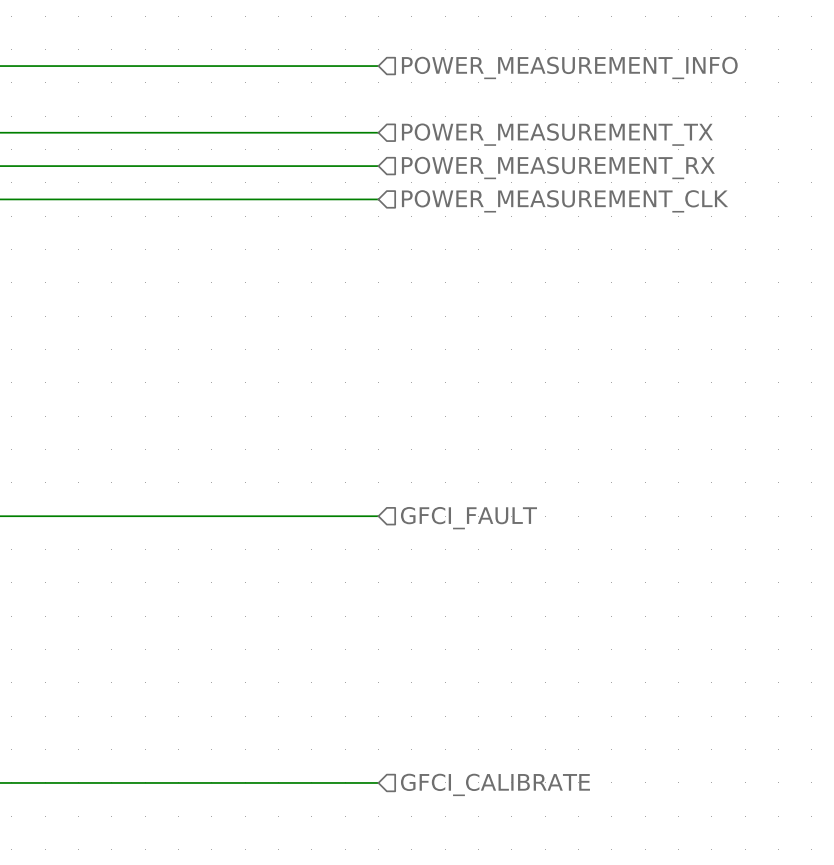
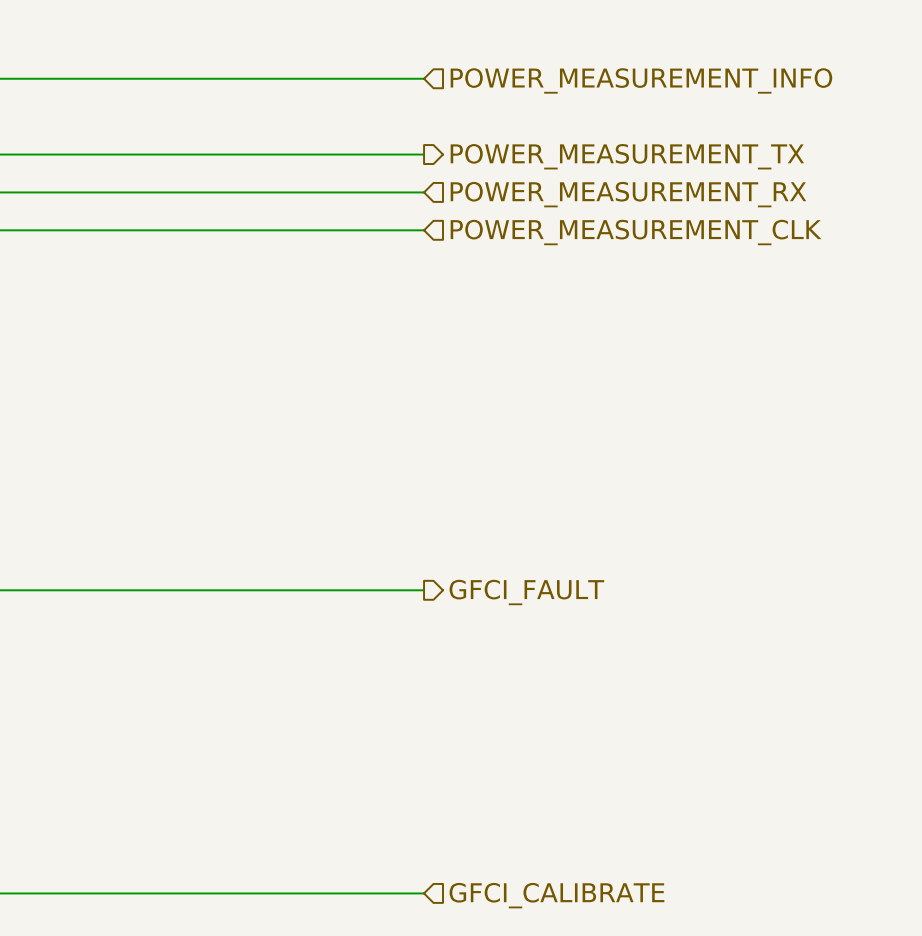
hierarchical label shape: input (557, 134) -> output (627, 156)
hierarchical label shape: input (468, 518) -> output (526, 592)

